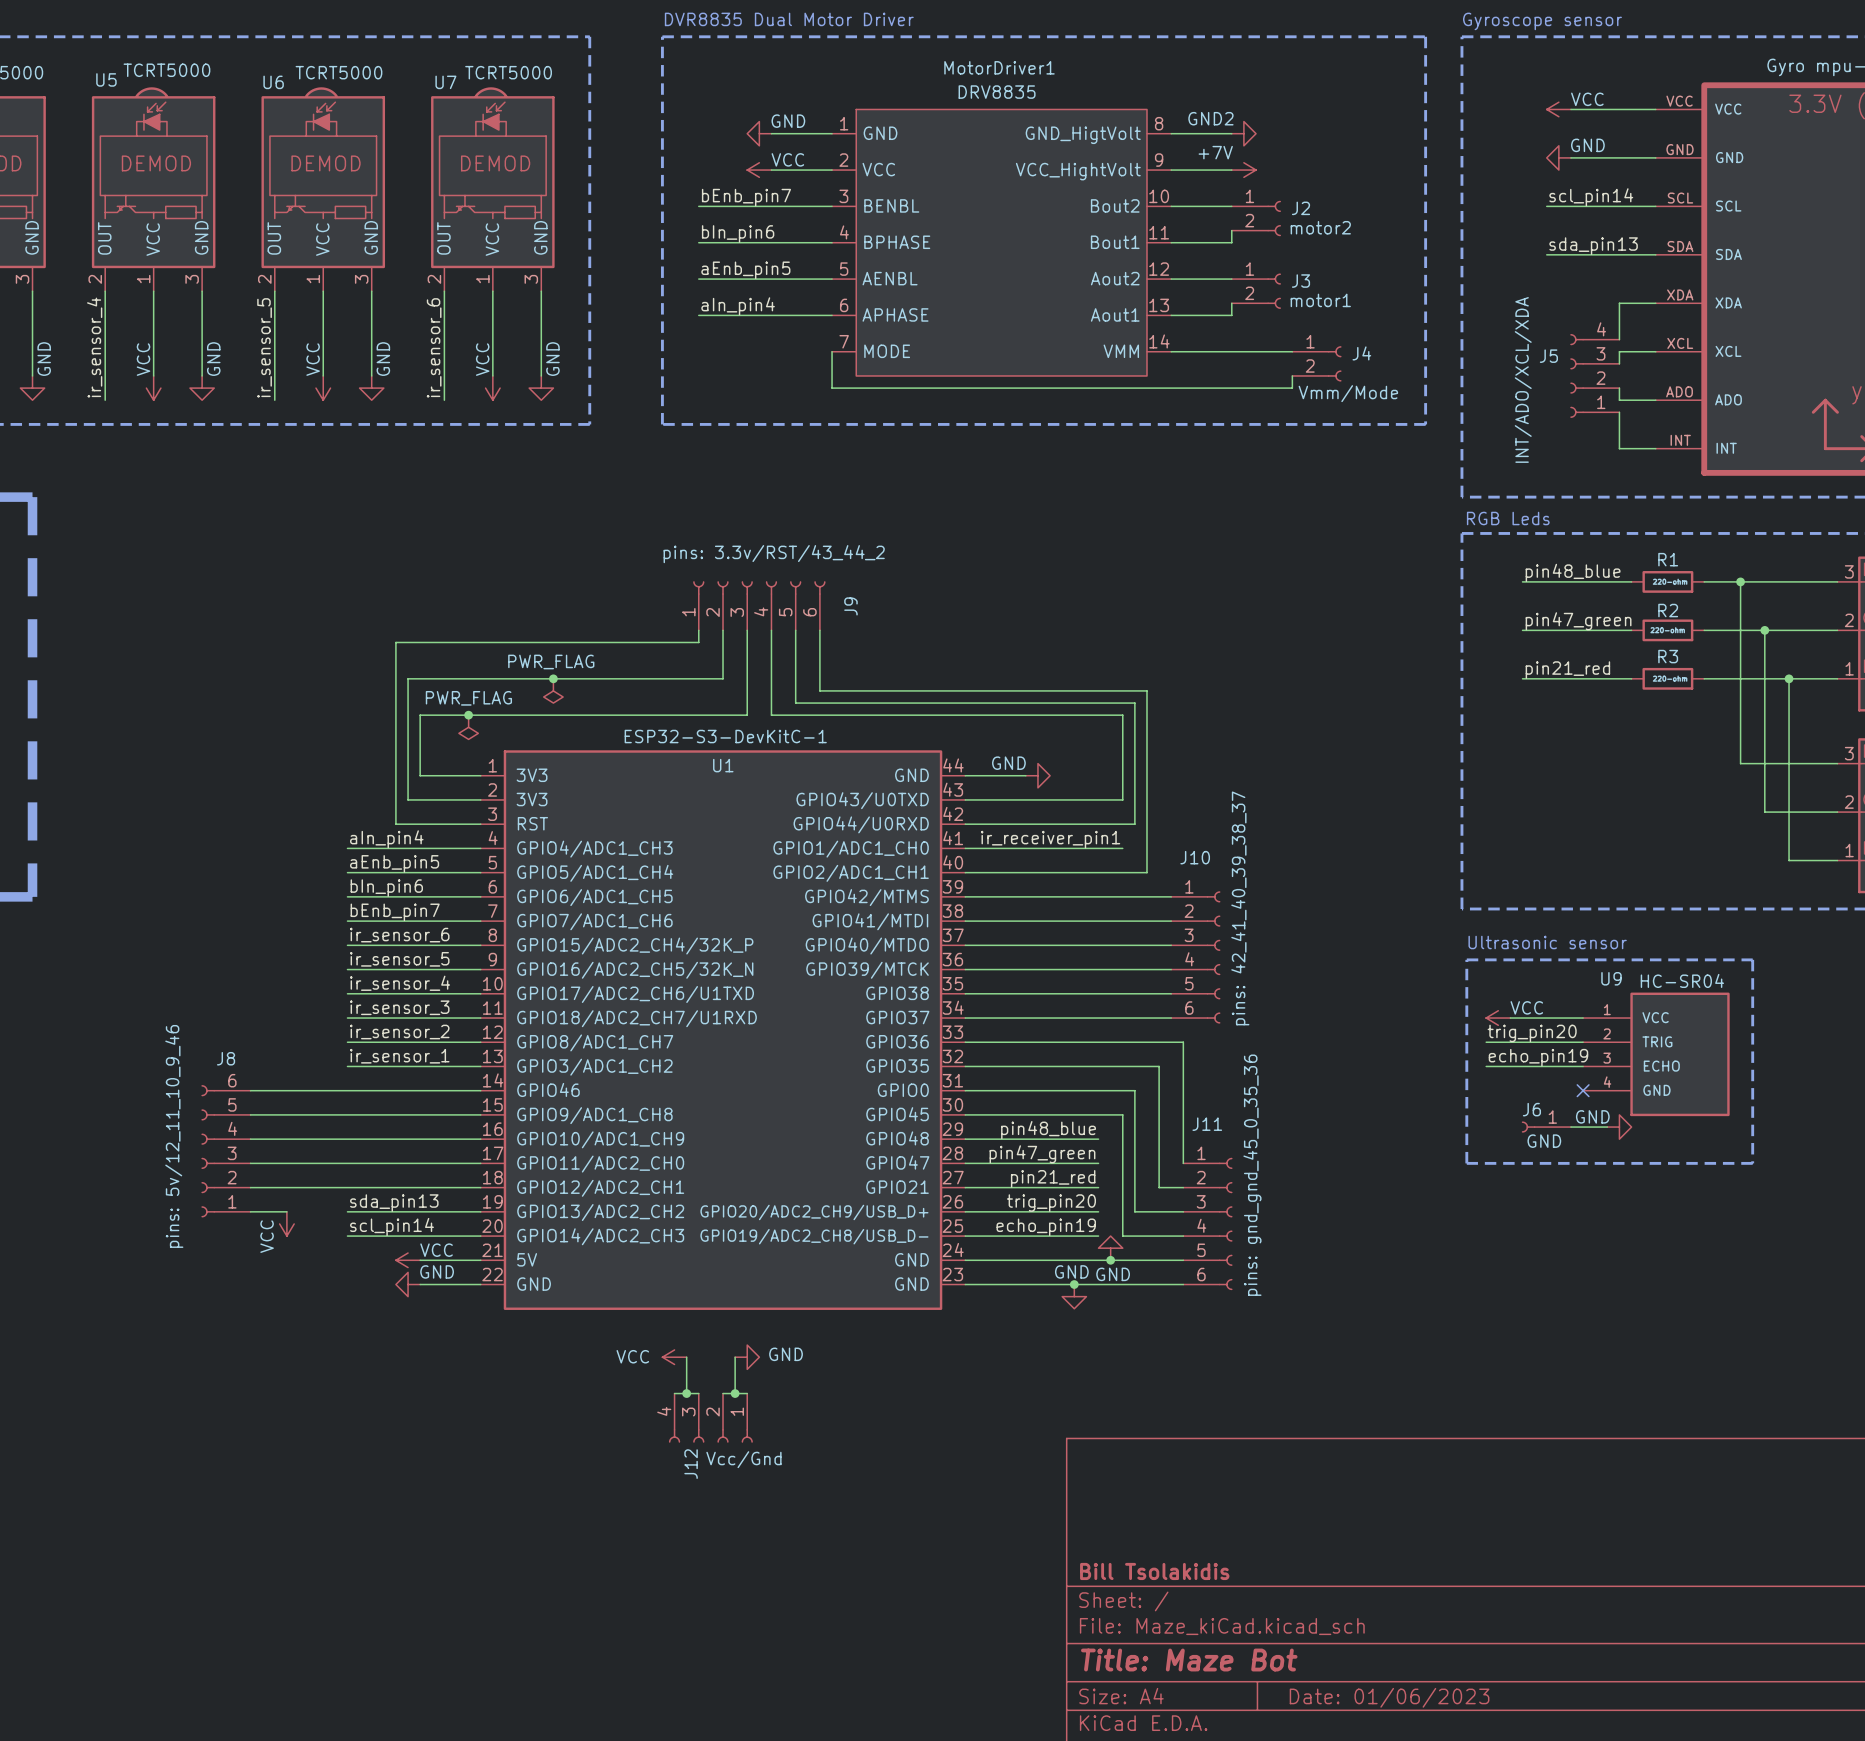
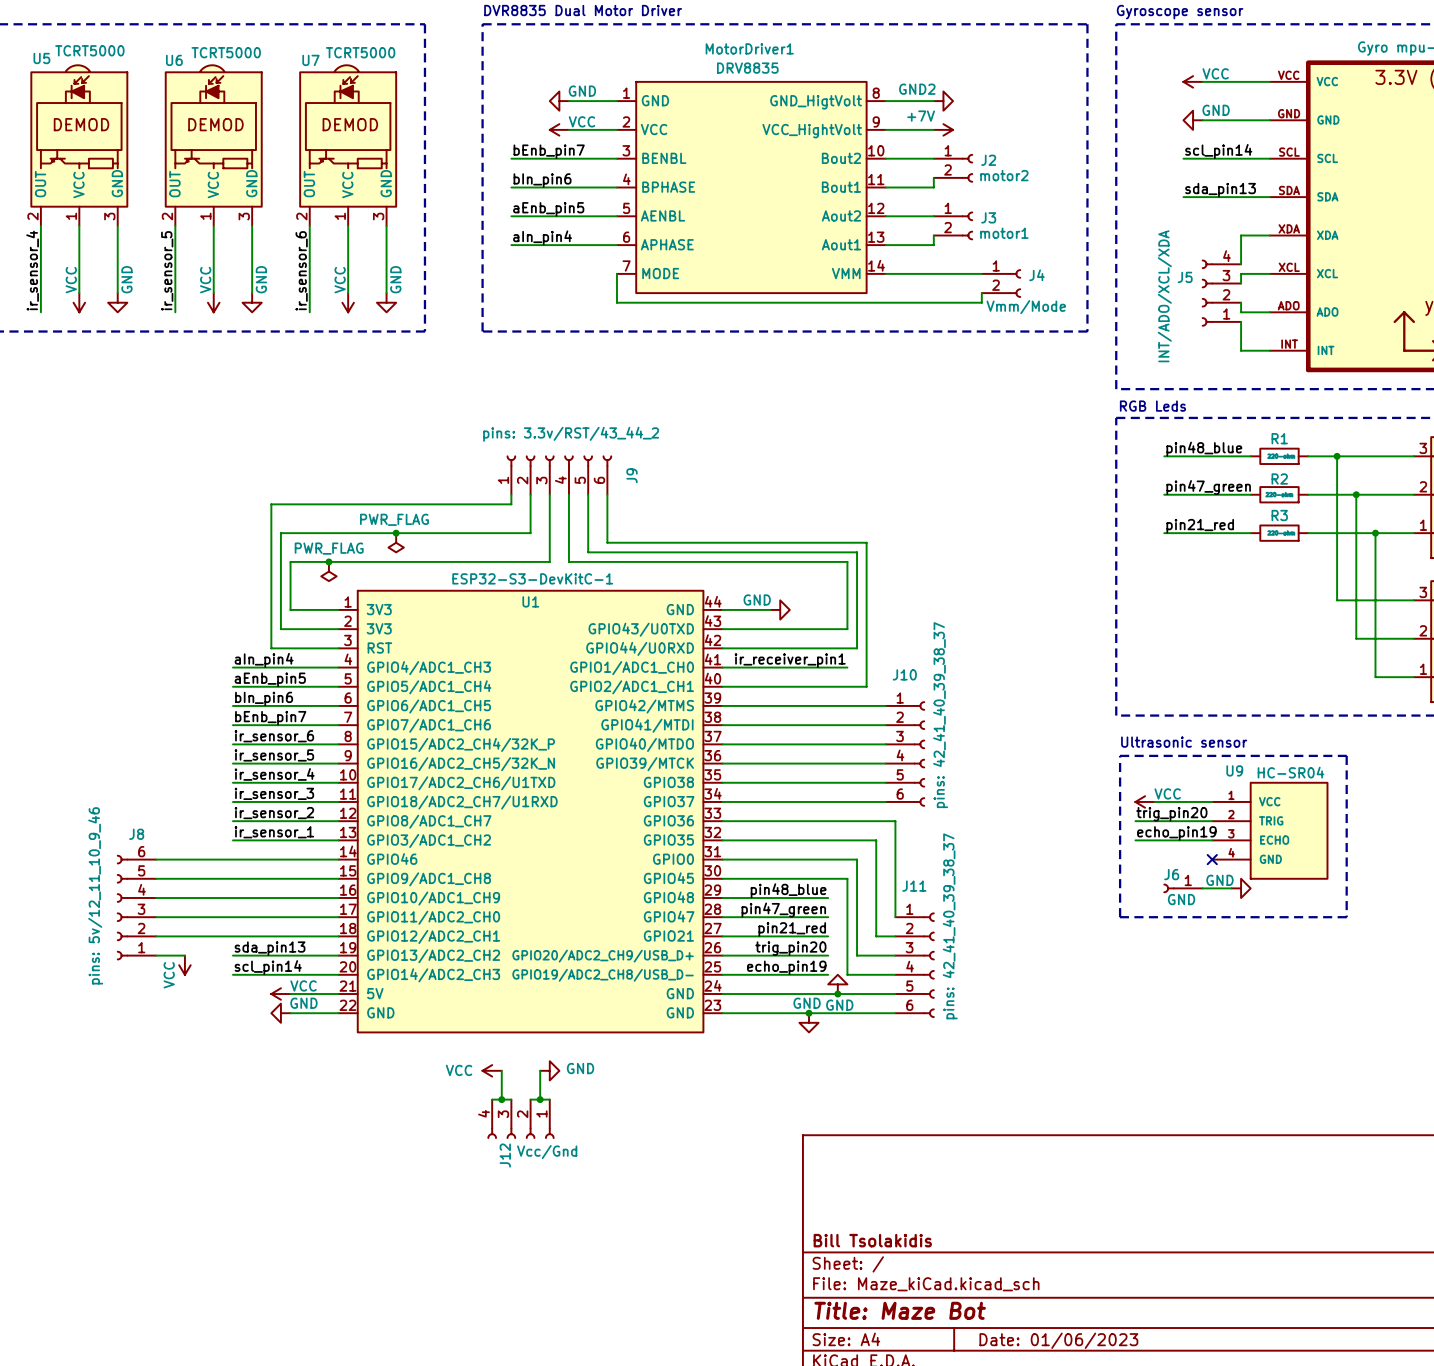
J11 value: pins: gnd_gnd_45_0_35_36 (1252, 1175) -> pins: 42_41_40_39_38_37 (950, 926)

